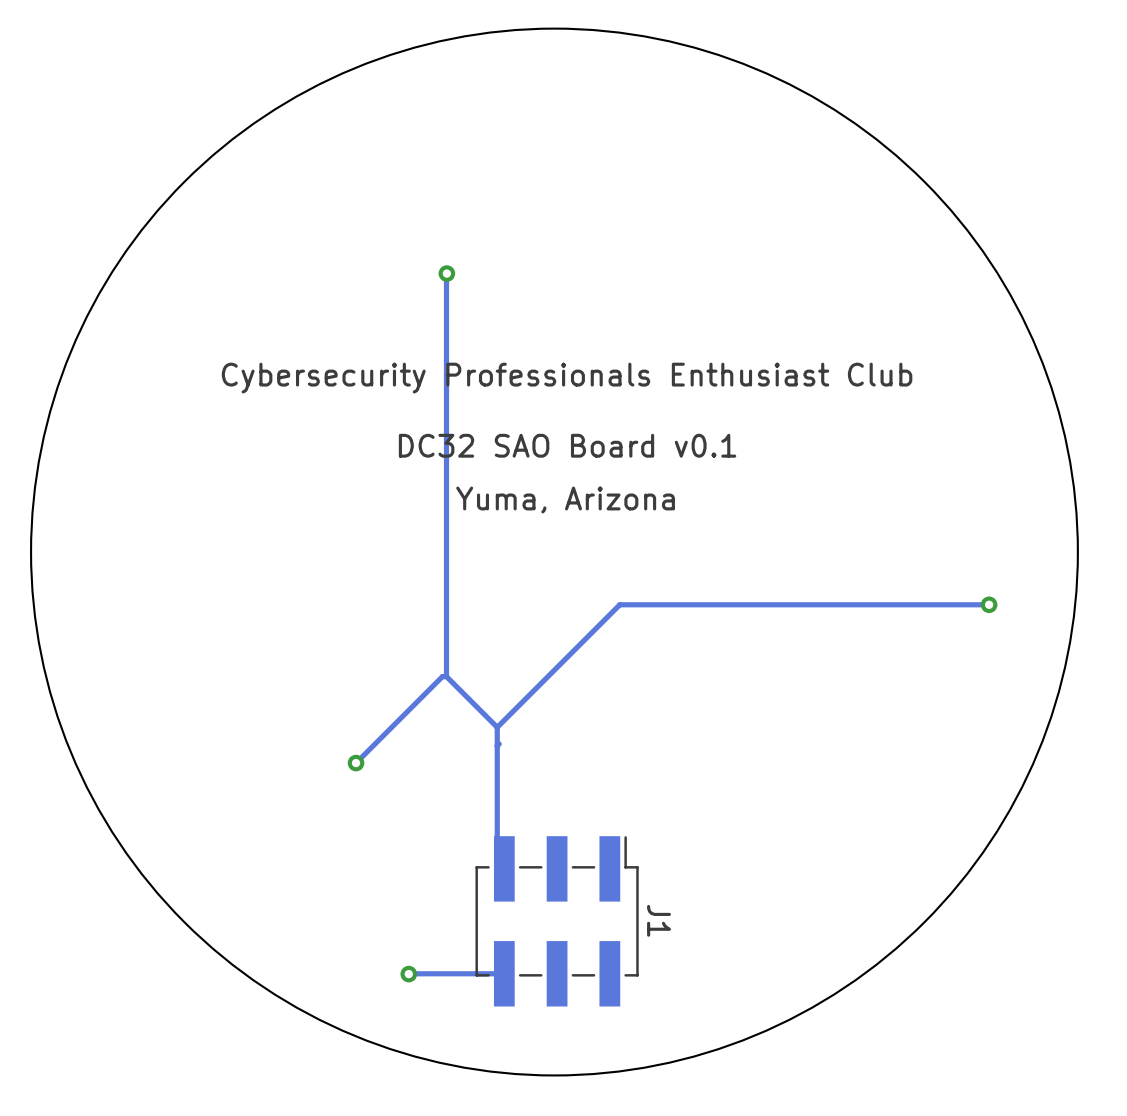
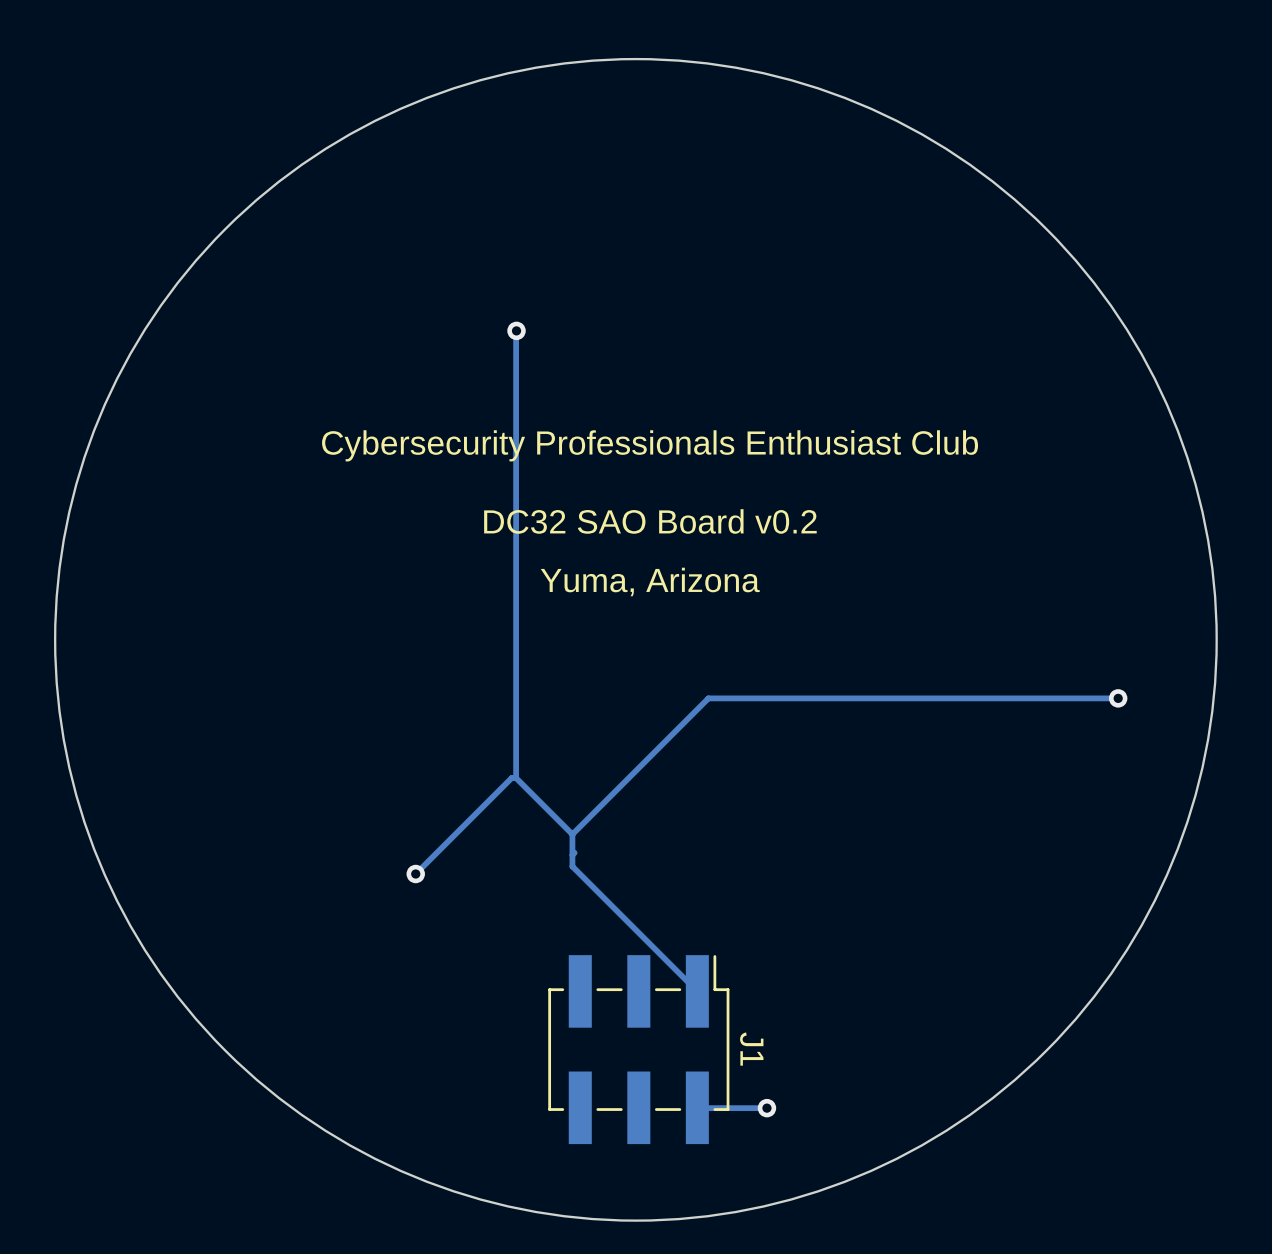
text: DC32 SAO Board v0.1 (567, 445) -> DC32 SAO Board v0.2 (650, 521)
track: (497, 756) (497, 868) -> (572, 866) (697, 991)
track: (497, 973) (408, 974) -> none
via: (408, 974) -> none
track: none -> (766, 1108) (708, 1108)
via: none -> (766, 1108)

